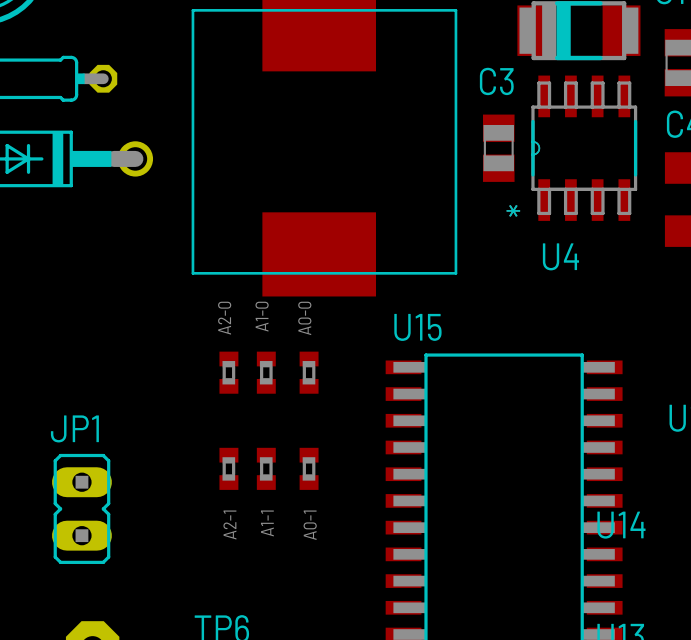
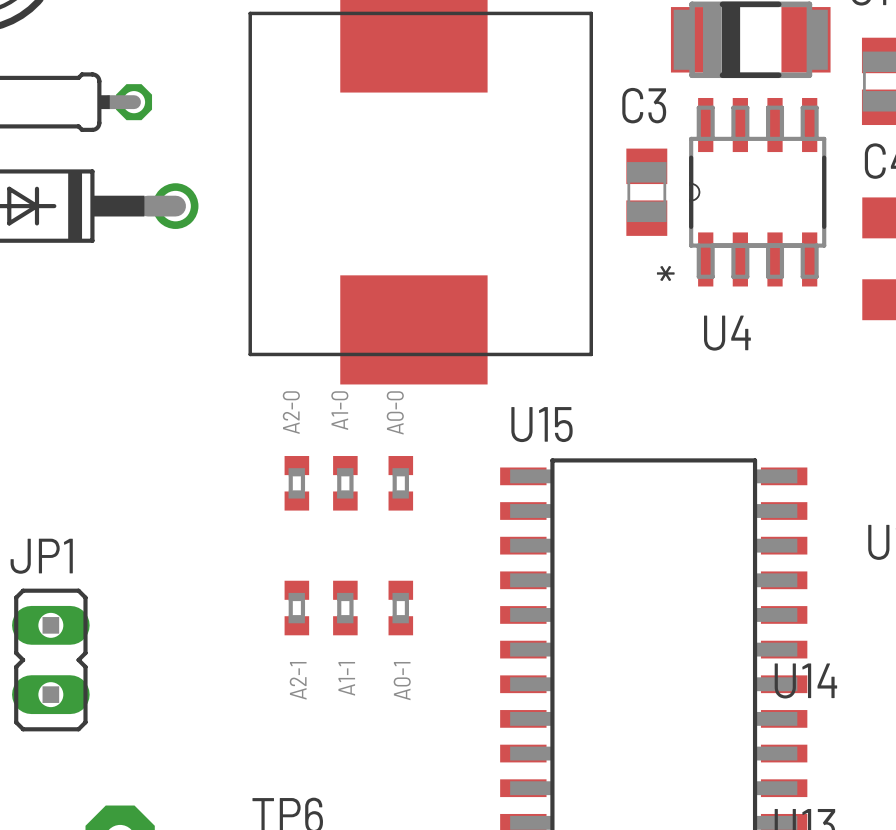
JP1 position: (81, 508) -> (50, 659)

